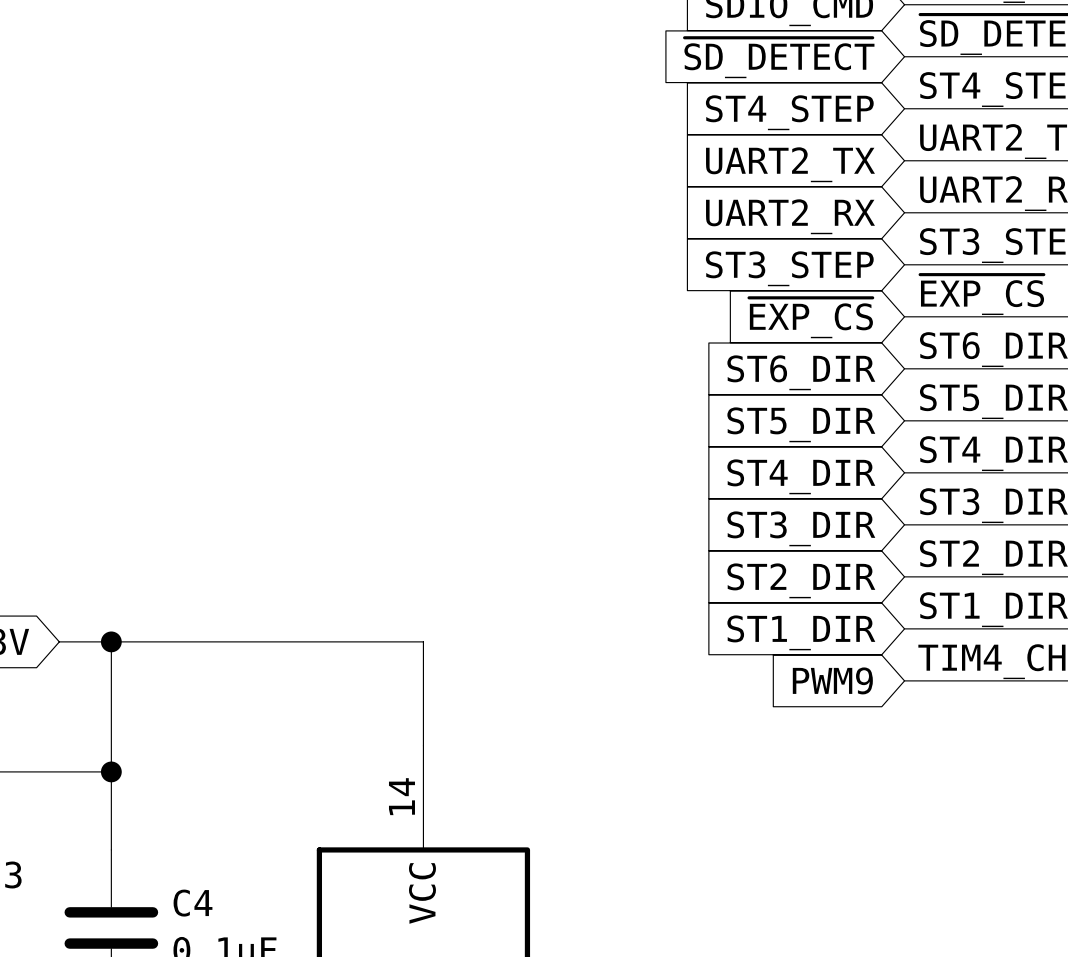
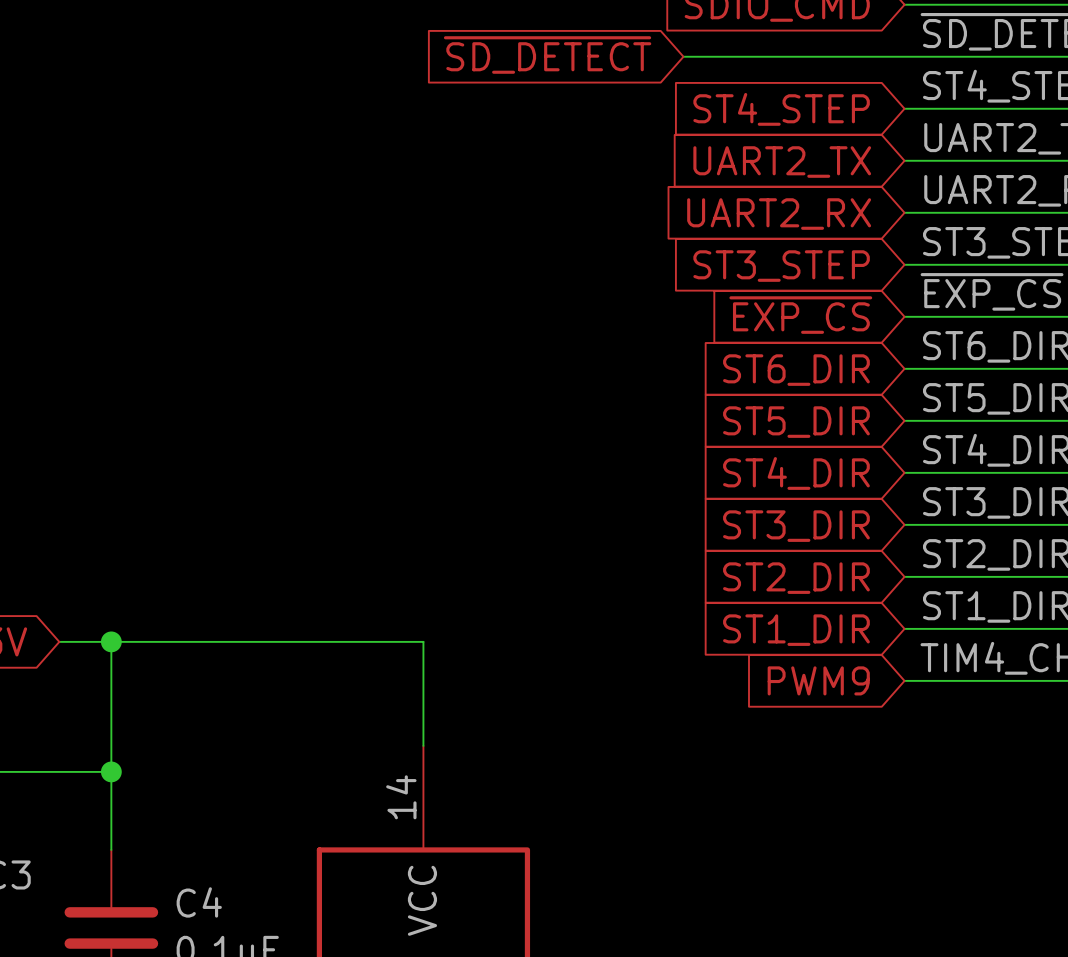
wire: none -> (683, 56) (904, 56)
global label position: ~{SD_DETECT} (779, 57) -> ~{SD_DETECT} (547, 55)

